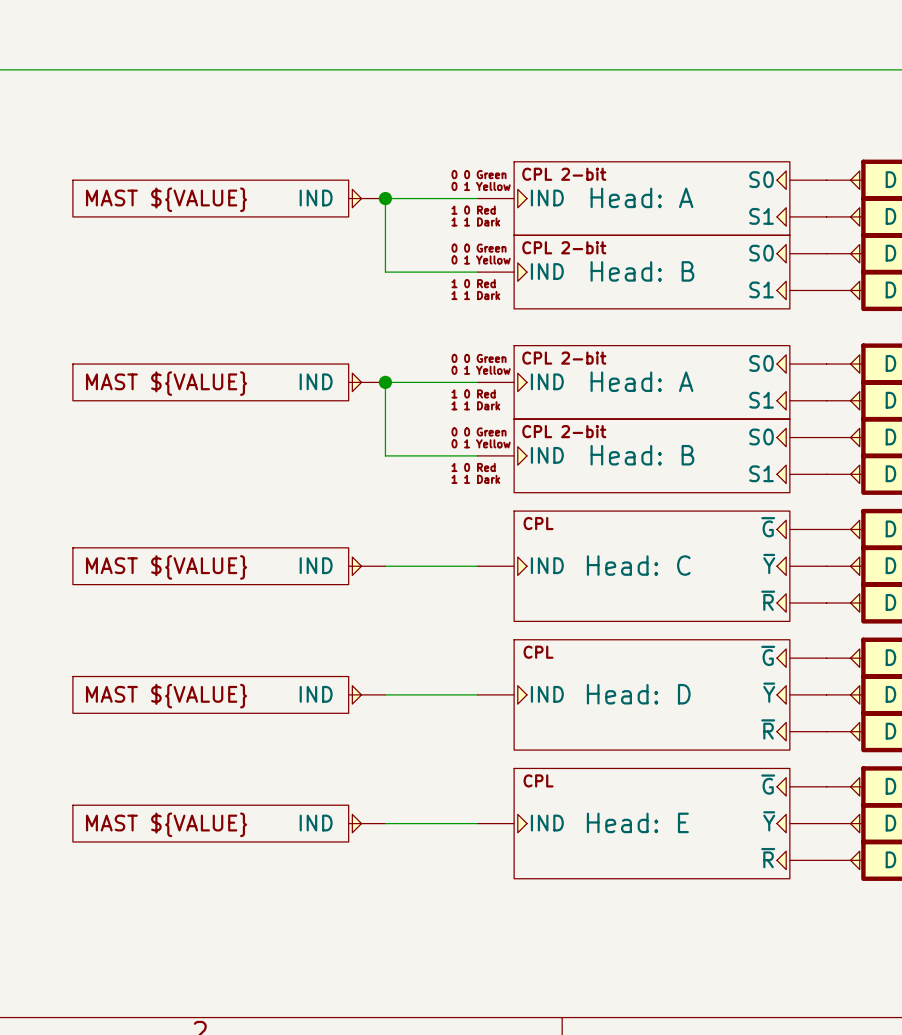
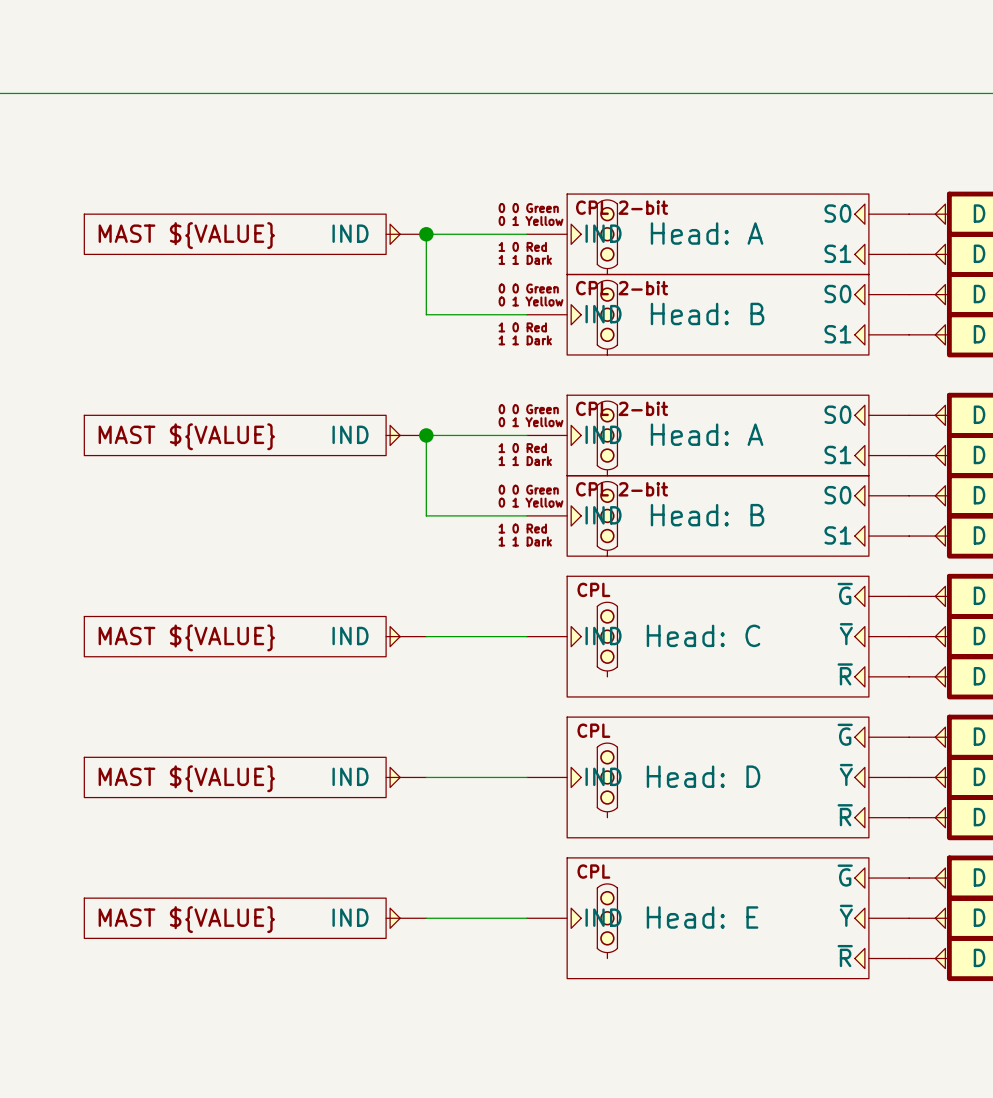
part symbol: [477, 161, 827, 236] -> [526, 194, 910, 275]
part symbol: [477, 235, 827, 309] -> [526, 274, 910, 355]
part symbol: [477, 345, 827, 420] -> [526, 395, 910, 476]
part symbol: [477, 419, 827, 493] -> [526, 475, 910, 557]
part symbol: [477, 511, 827, 622] -> [526, 576, 910, 697]
part symbol: [477, 639, 827, 751] -> [526, 717, 910, 838]
part symbol: [477, 768, 827, 879] -> [526, 857, 910, 979]

